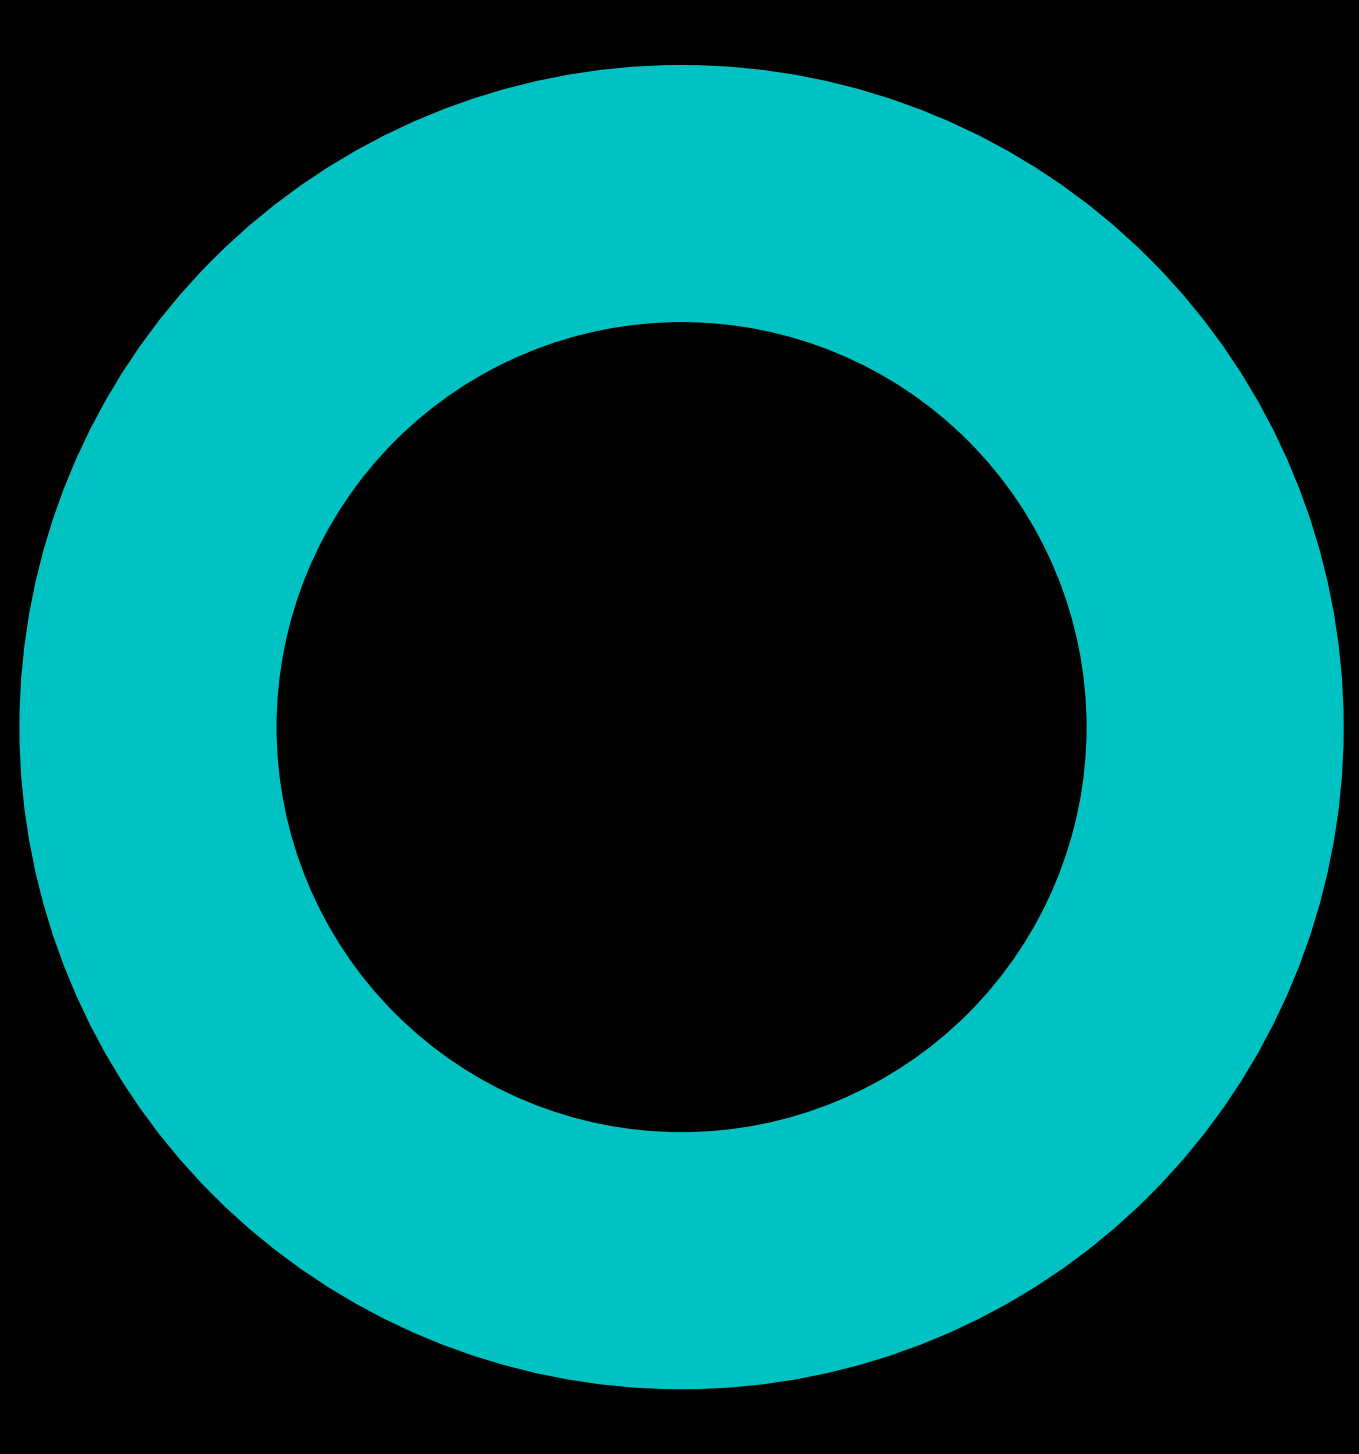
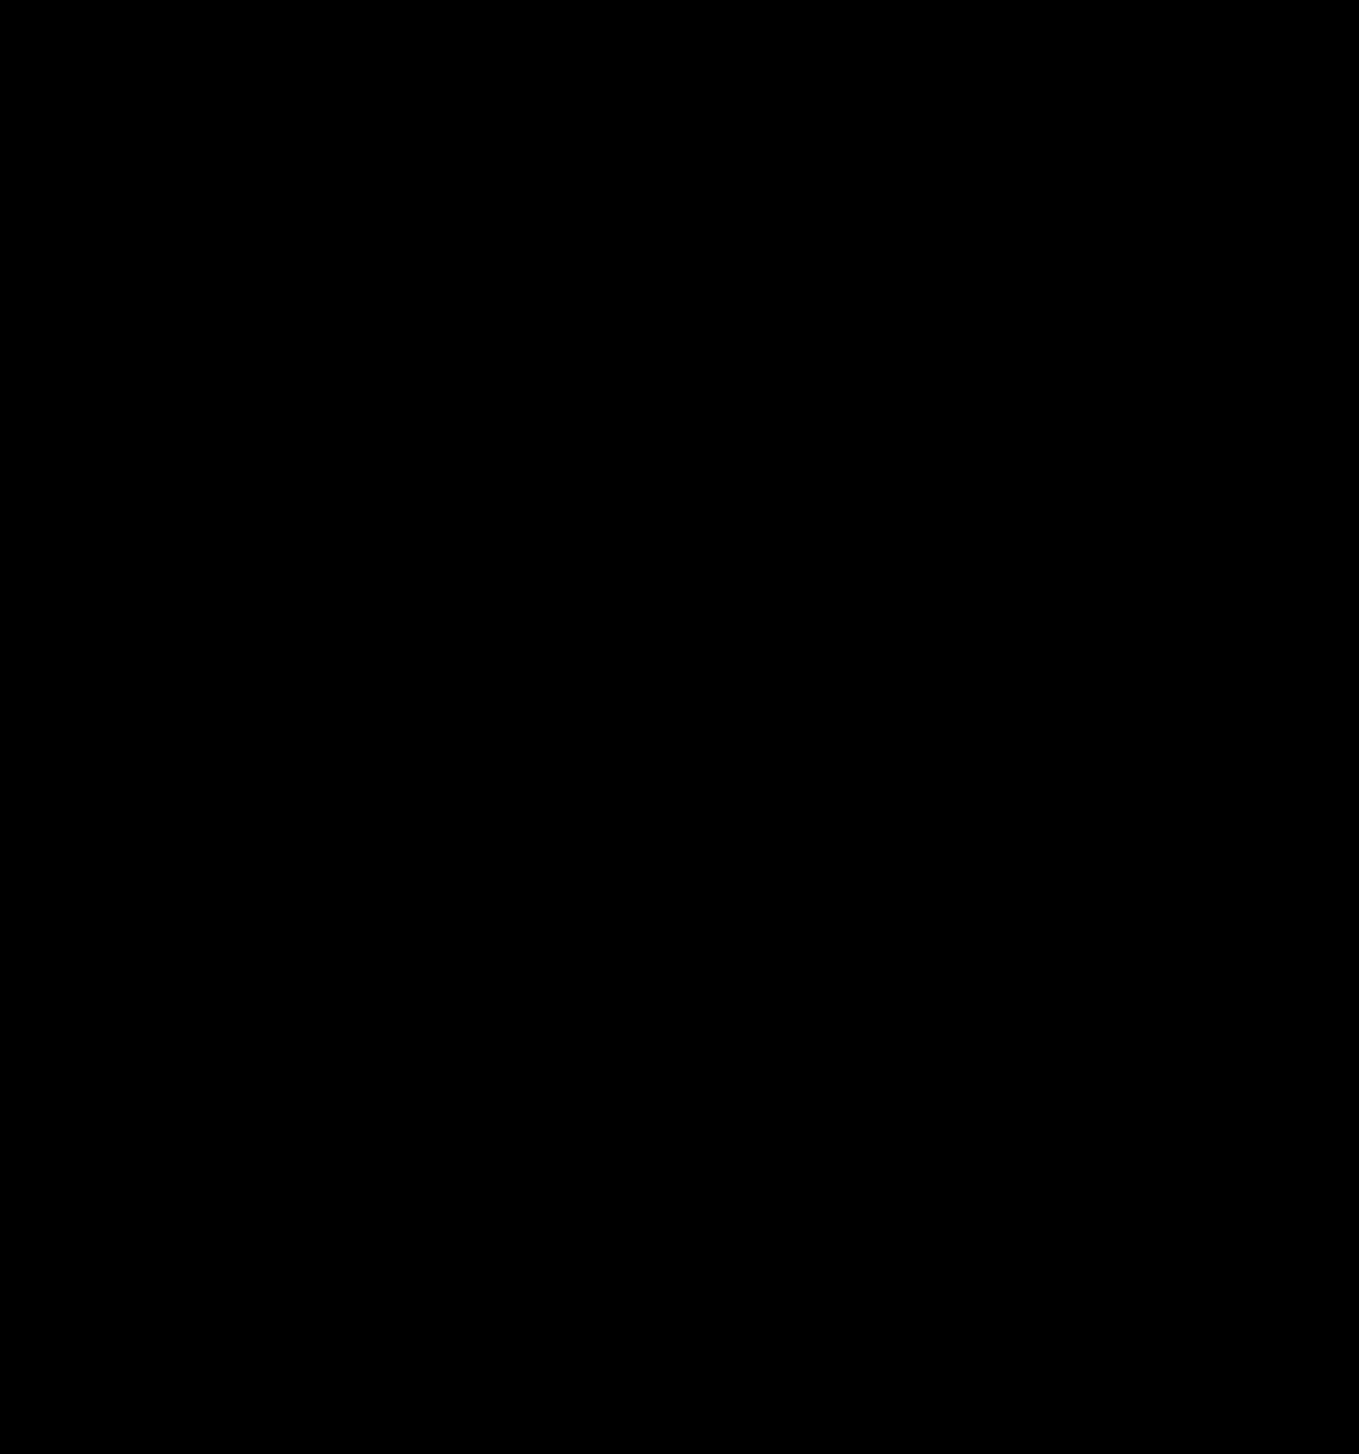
drawing: [19, 64, 1344, 1390] -> none

